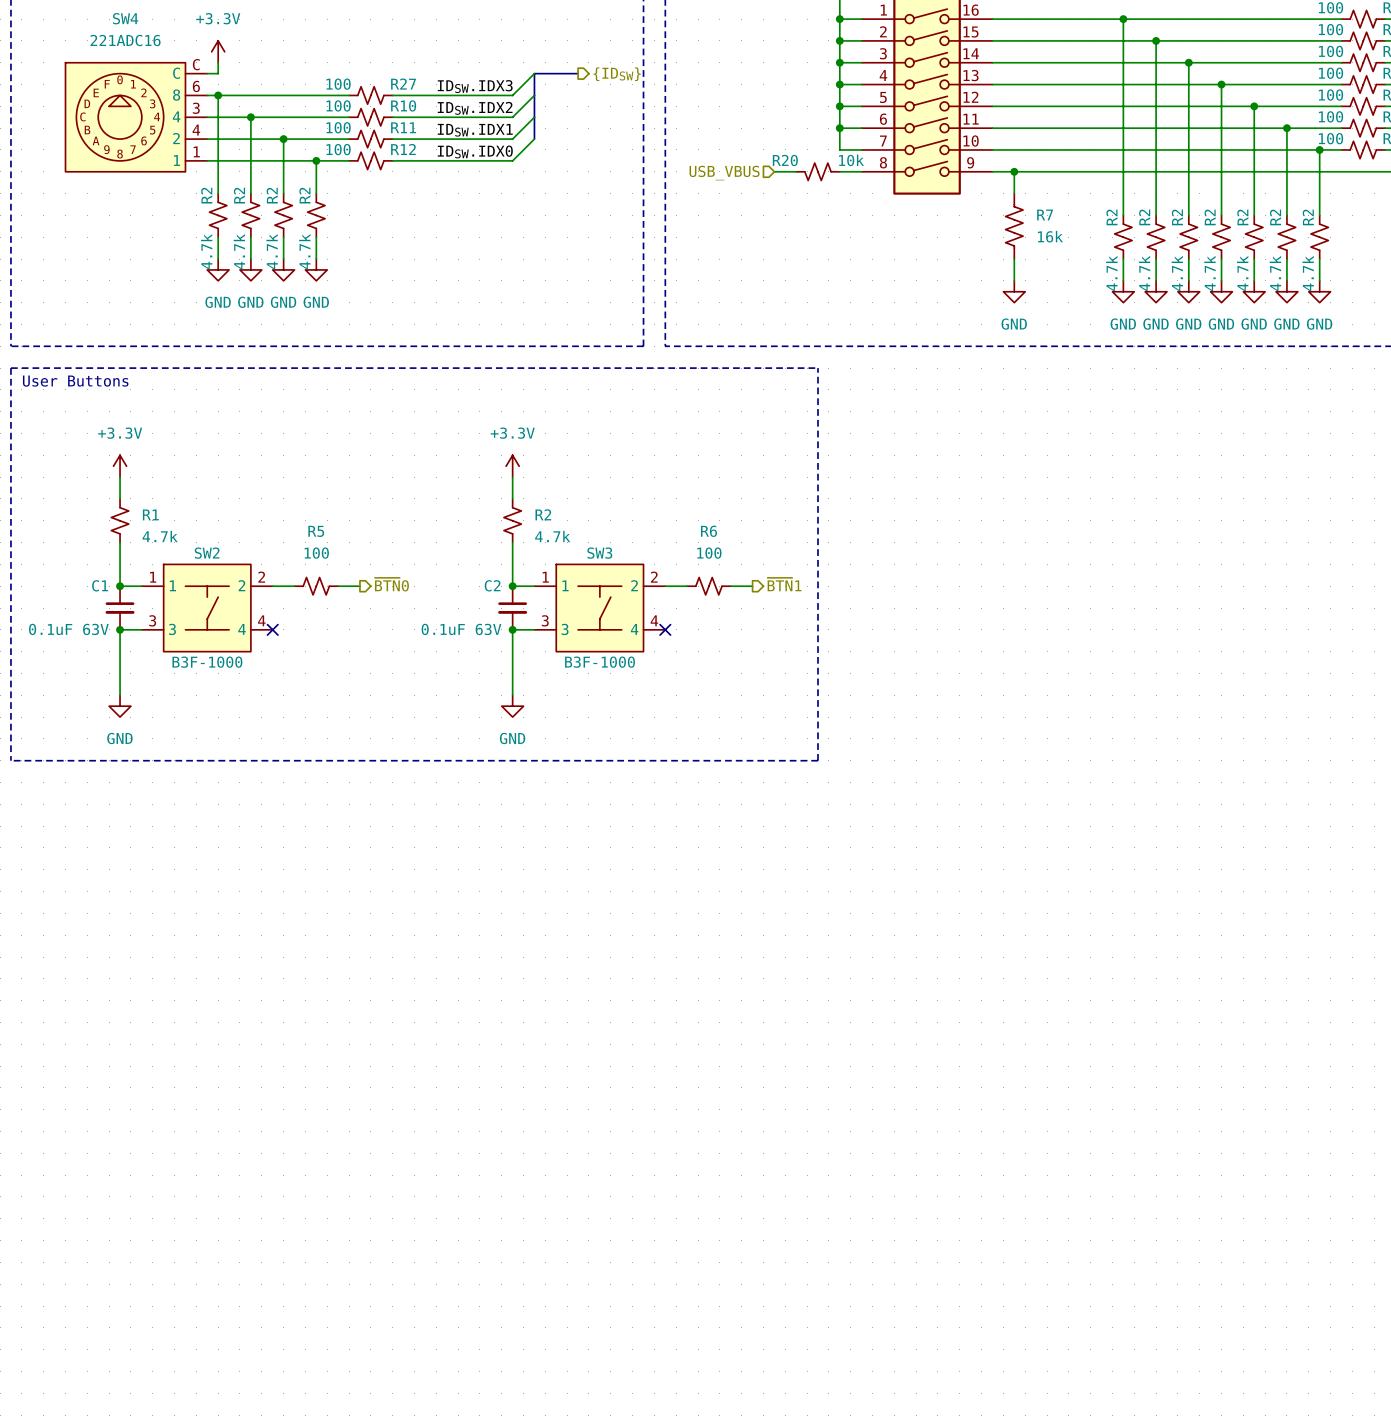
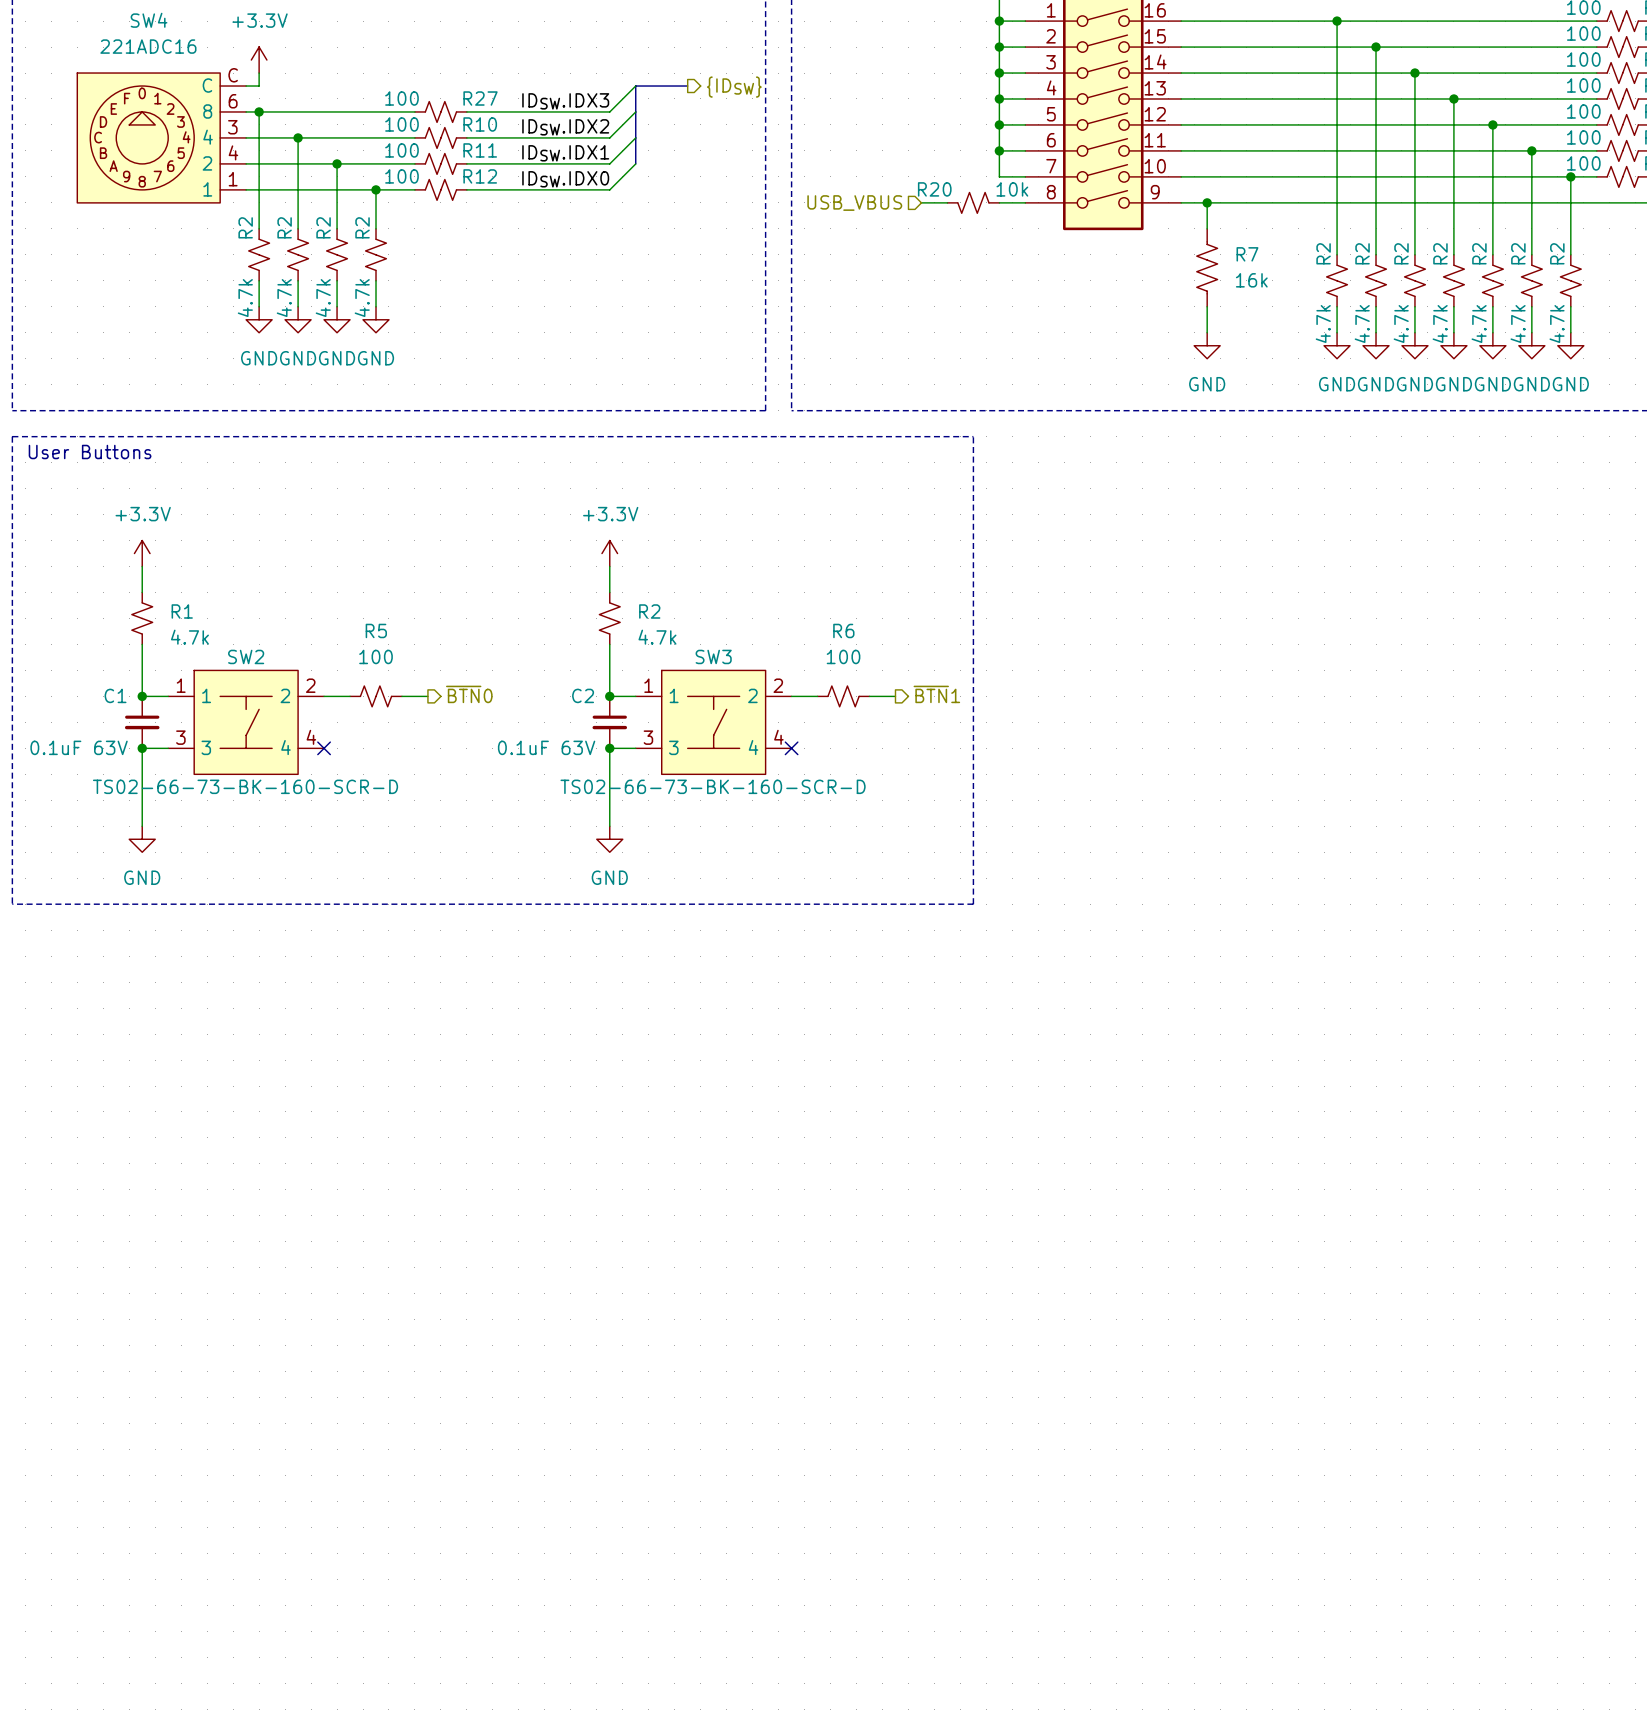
SW2 value: B3F-1000 (207, 662) -> TS02-66-73-BK-160-SCR-D (245, 786)
SW3 value: B3F-1000 (600, 662) -> TS02-66-73-BK-160-SCR-D (713, 786)

